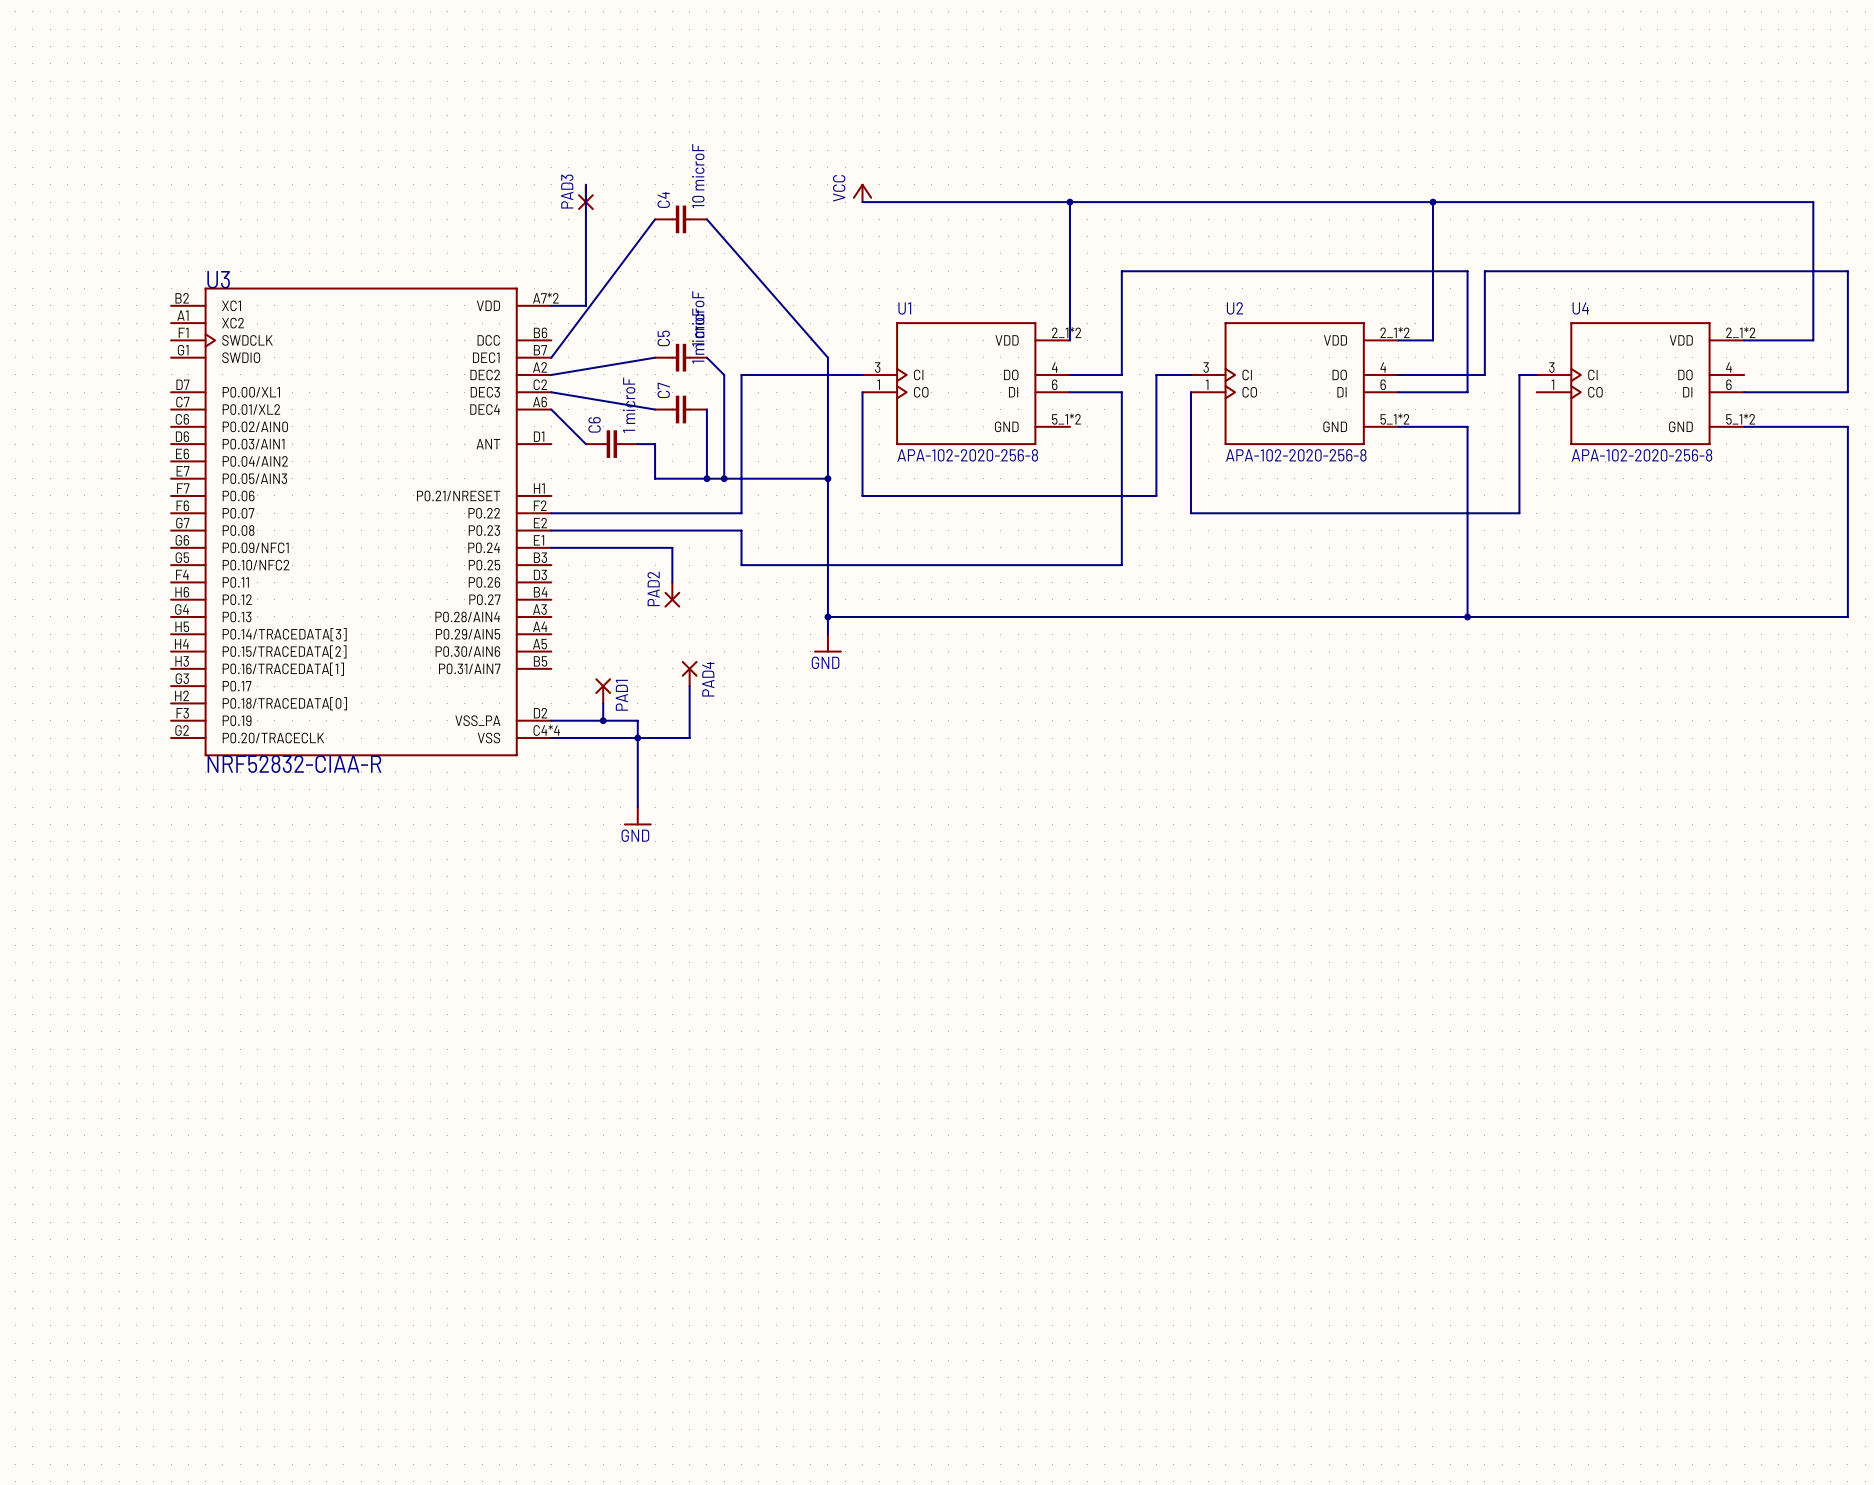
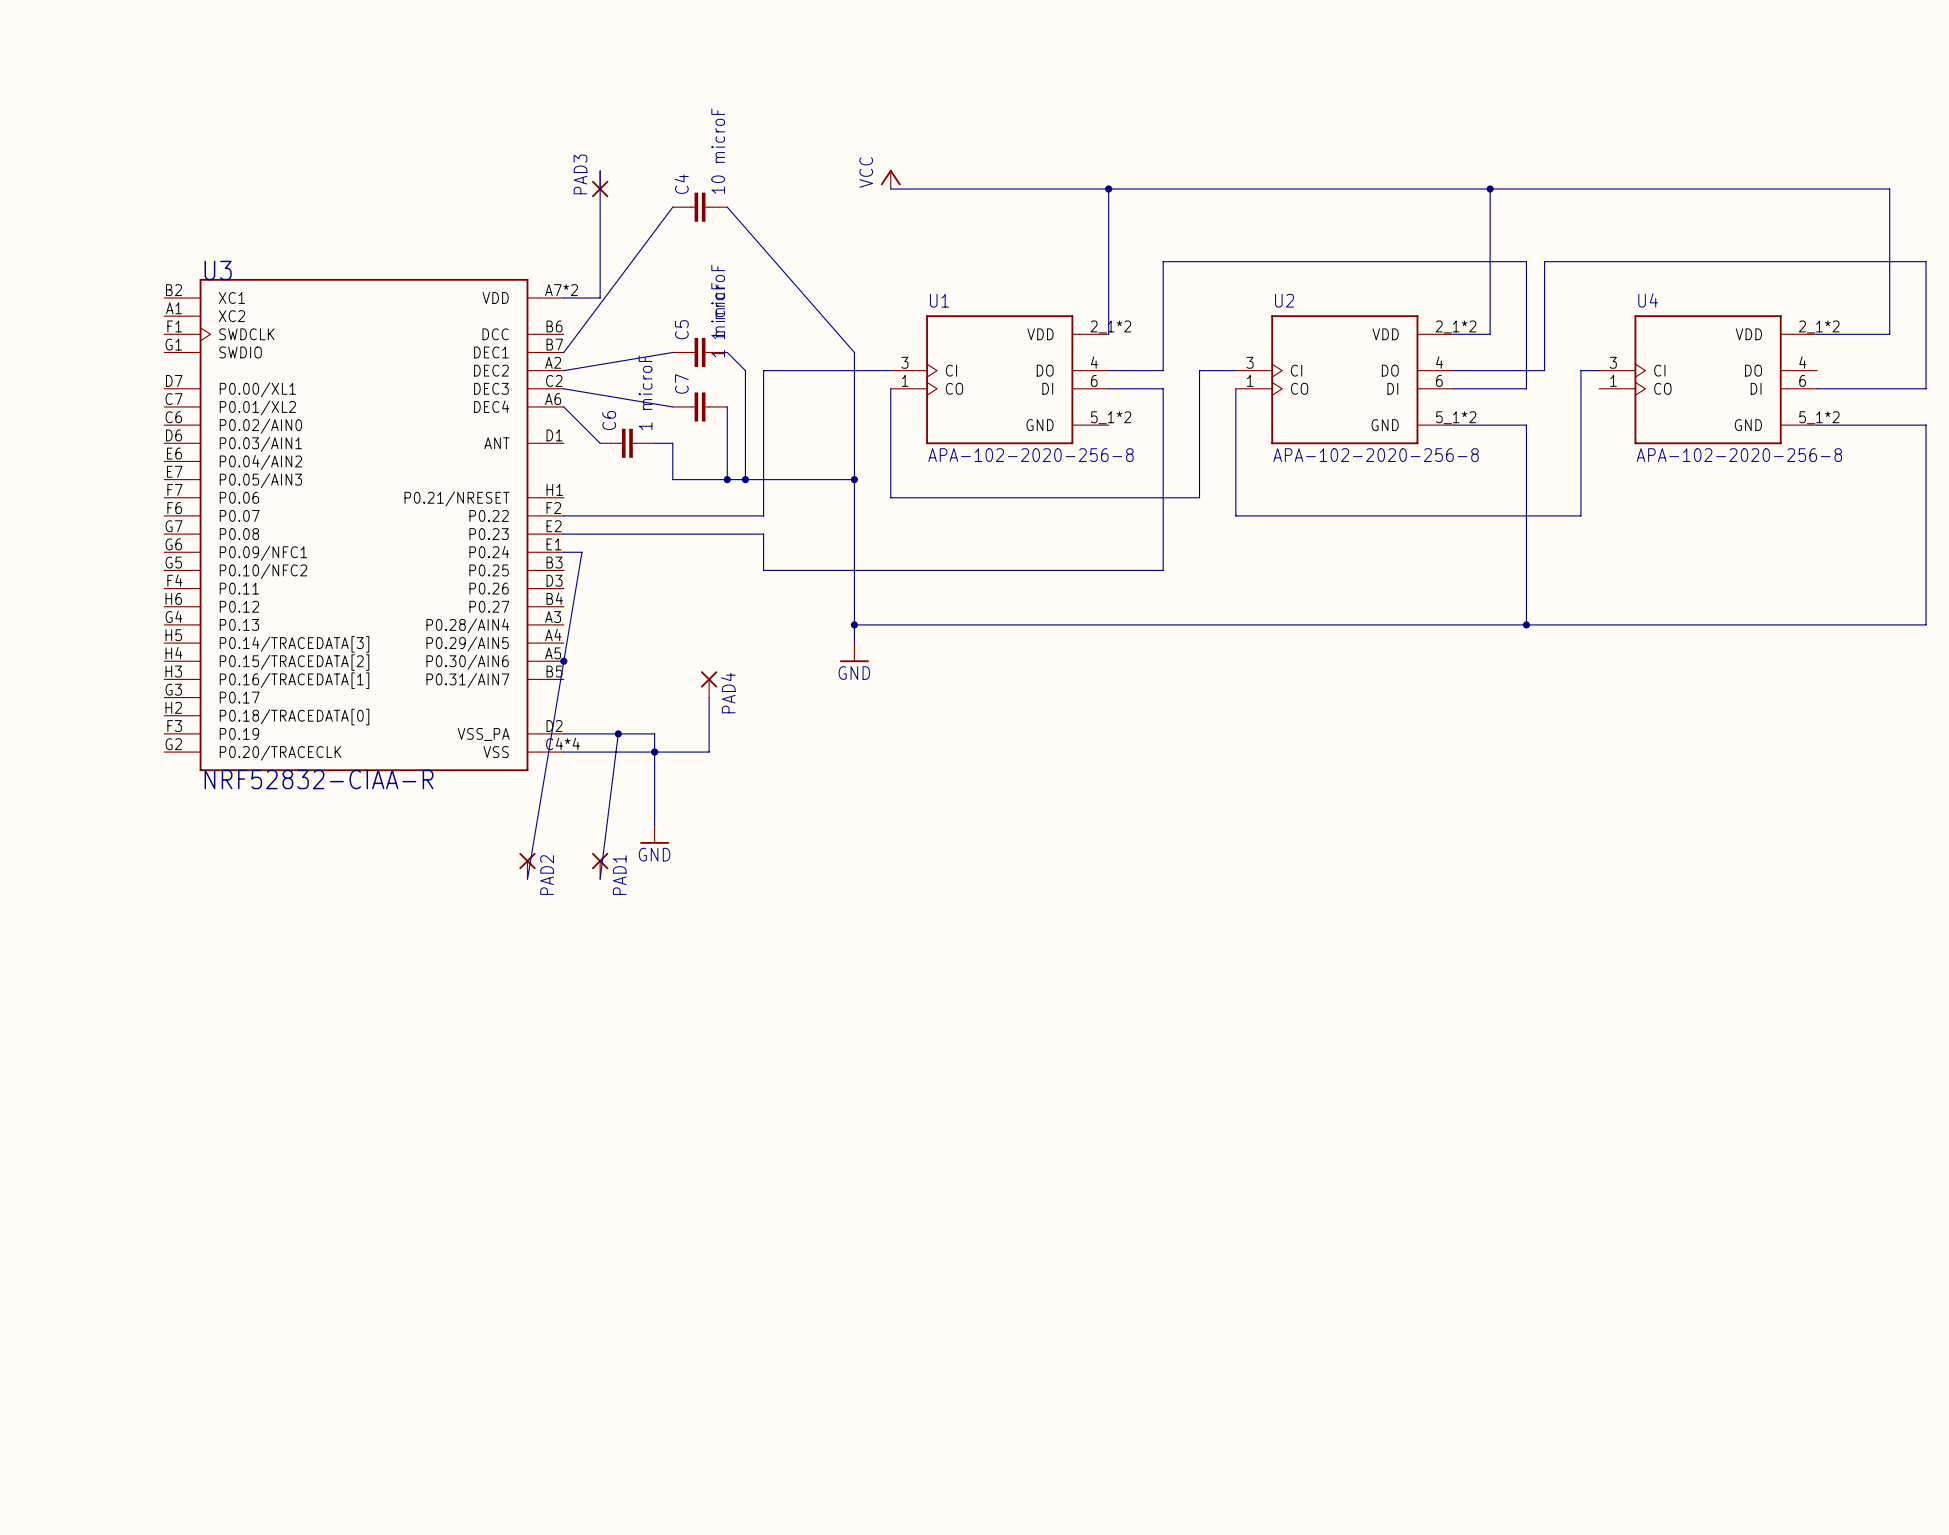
wire: (568, 547) (672, 547) (672, 582) -> (581, 552) (527, 879)
PAD2 position: (672, 594) -> (527, 866)
PAD2 rotation: 0° (672, 599) -> 180° (527, 861)
junction: none -> (563, 661)
PAD1 position: (603, 690) -> (600, 866)
wire: (603, 703) (603, 720) -> (600, 879) (618, 733)

